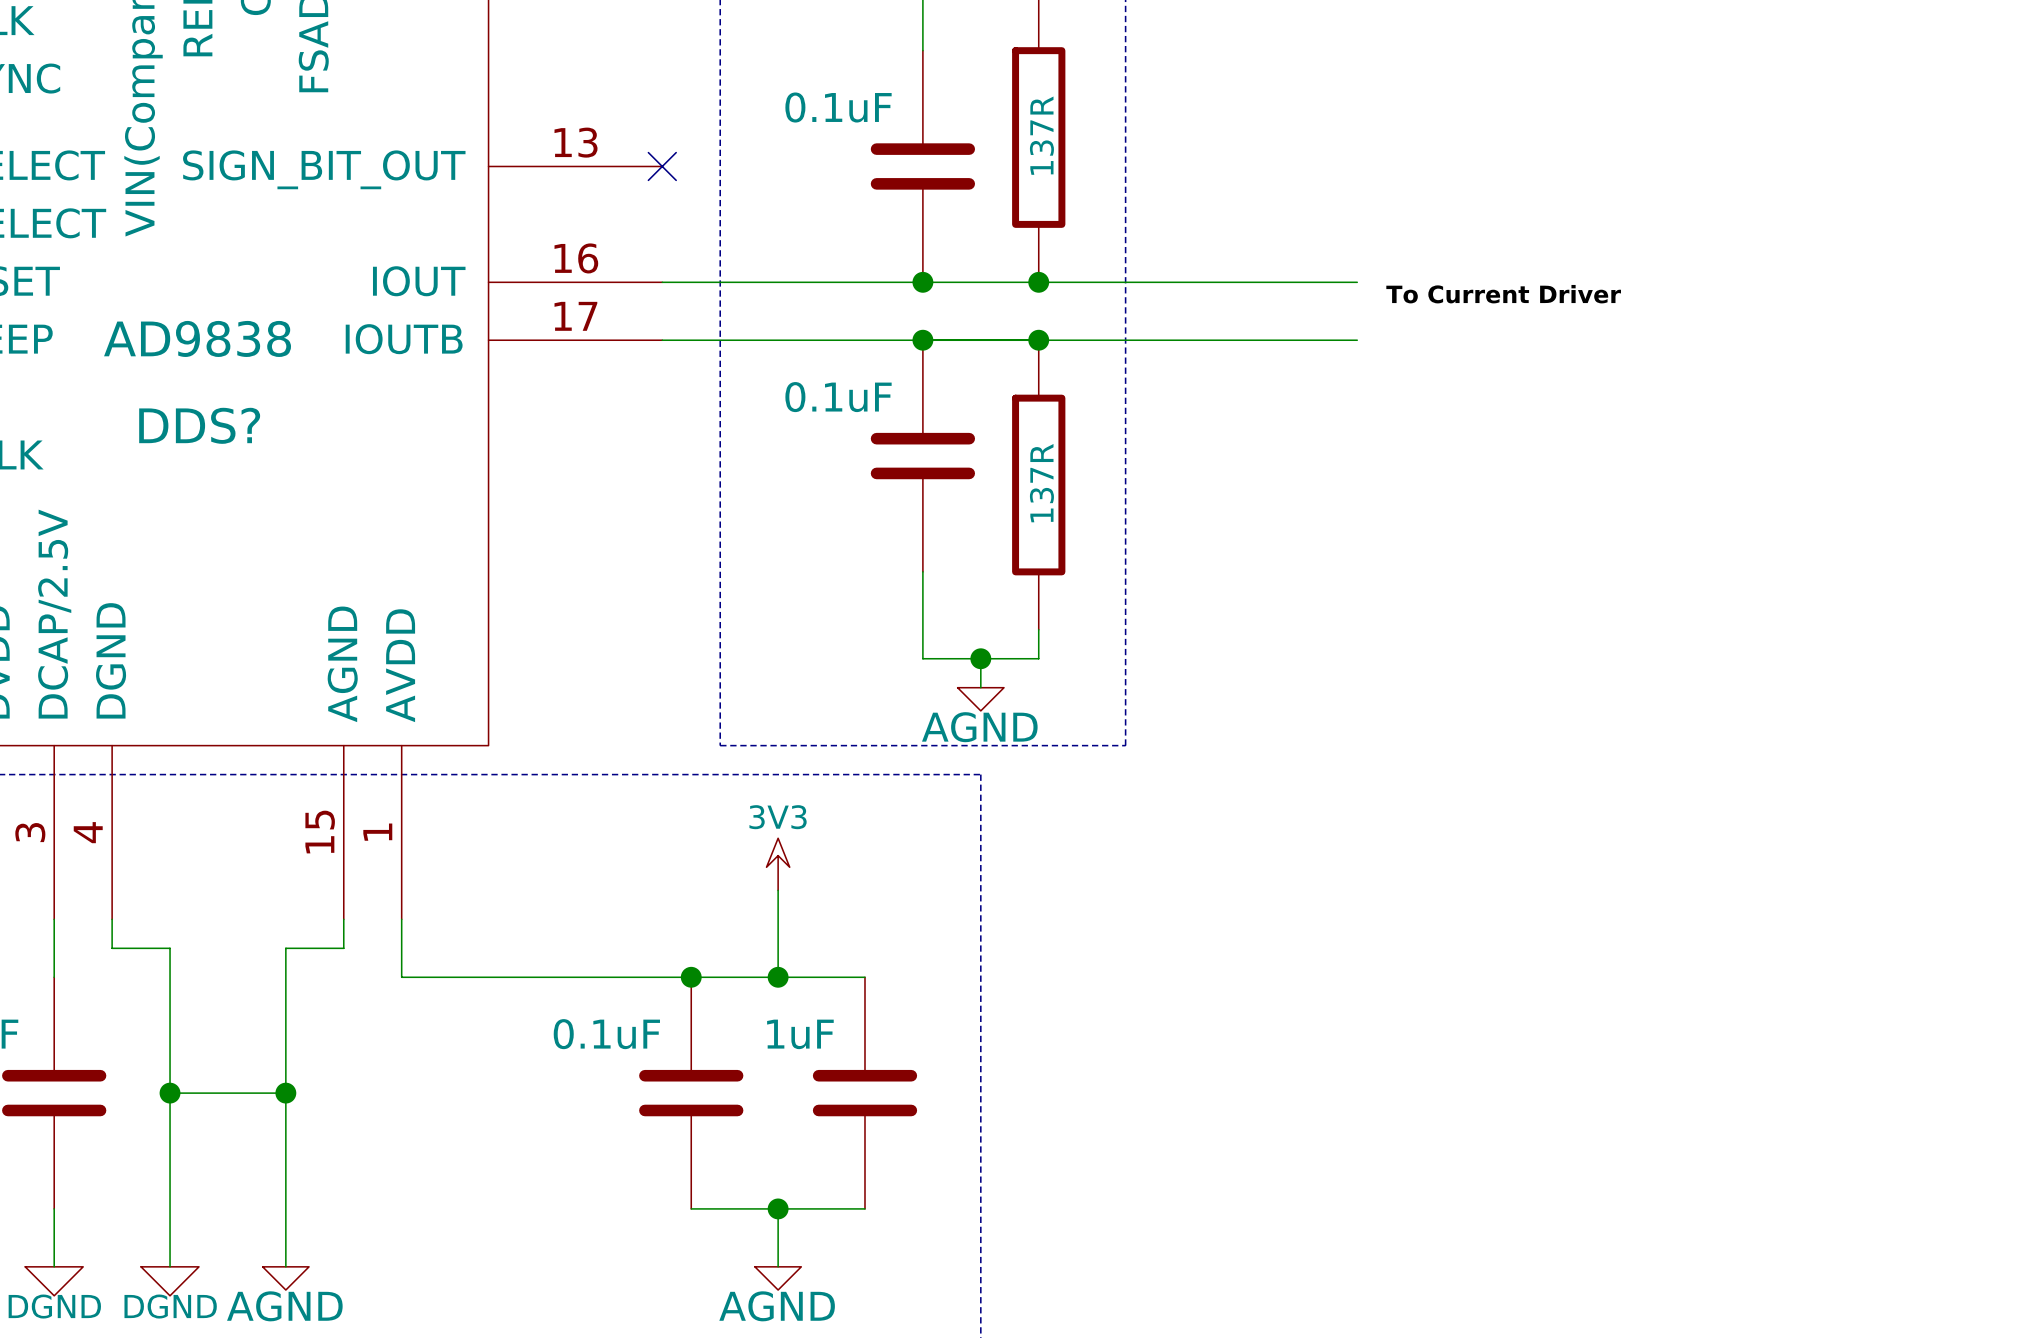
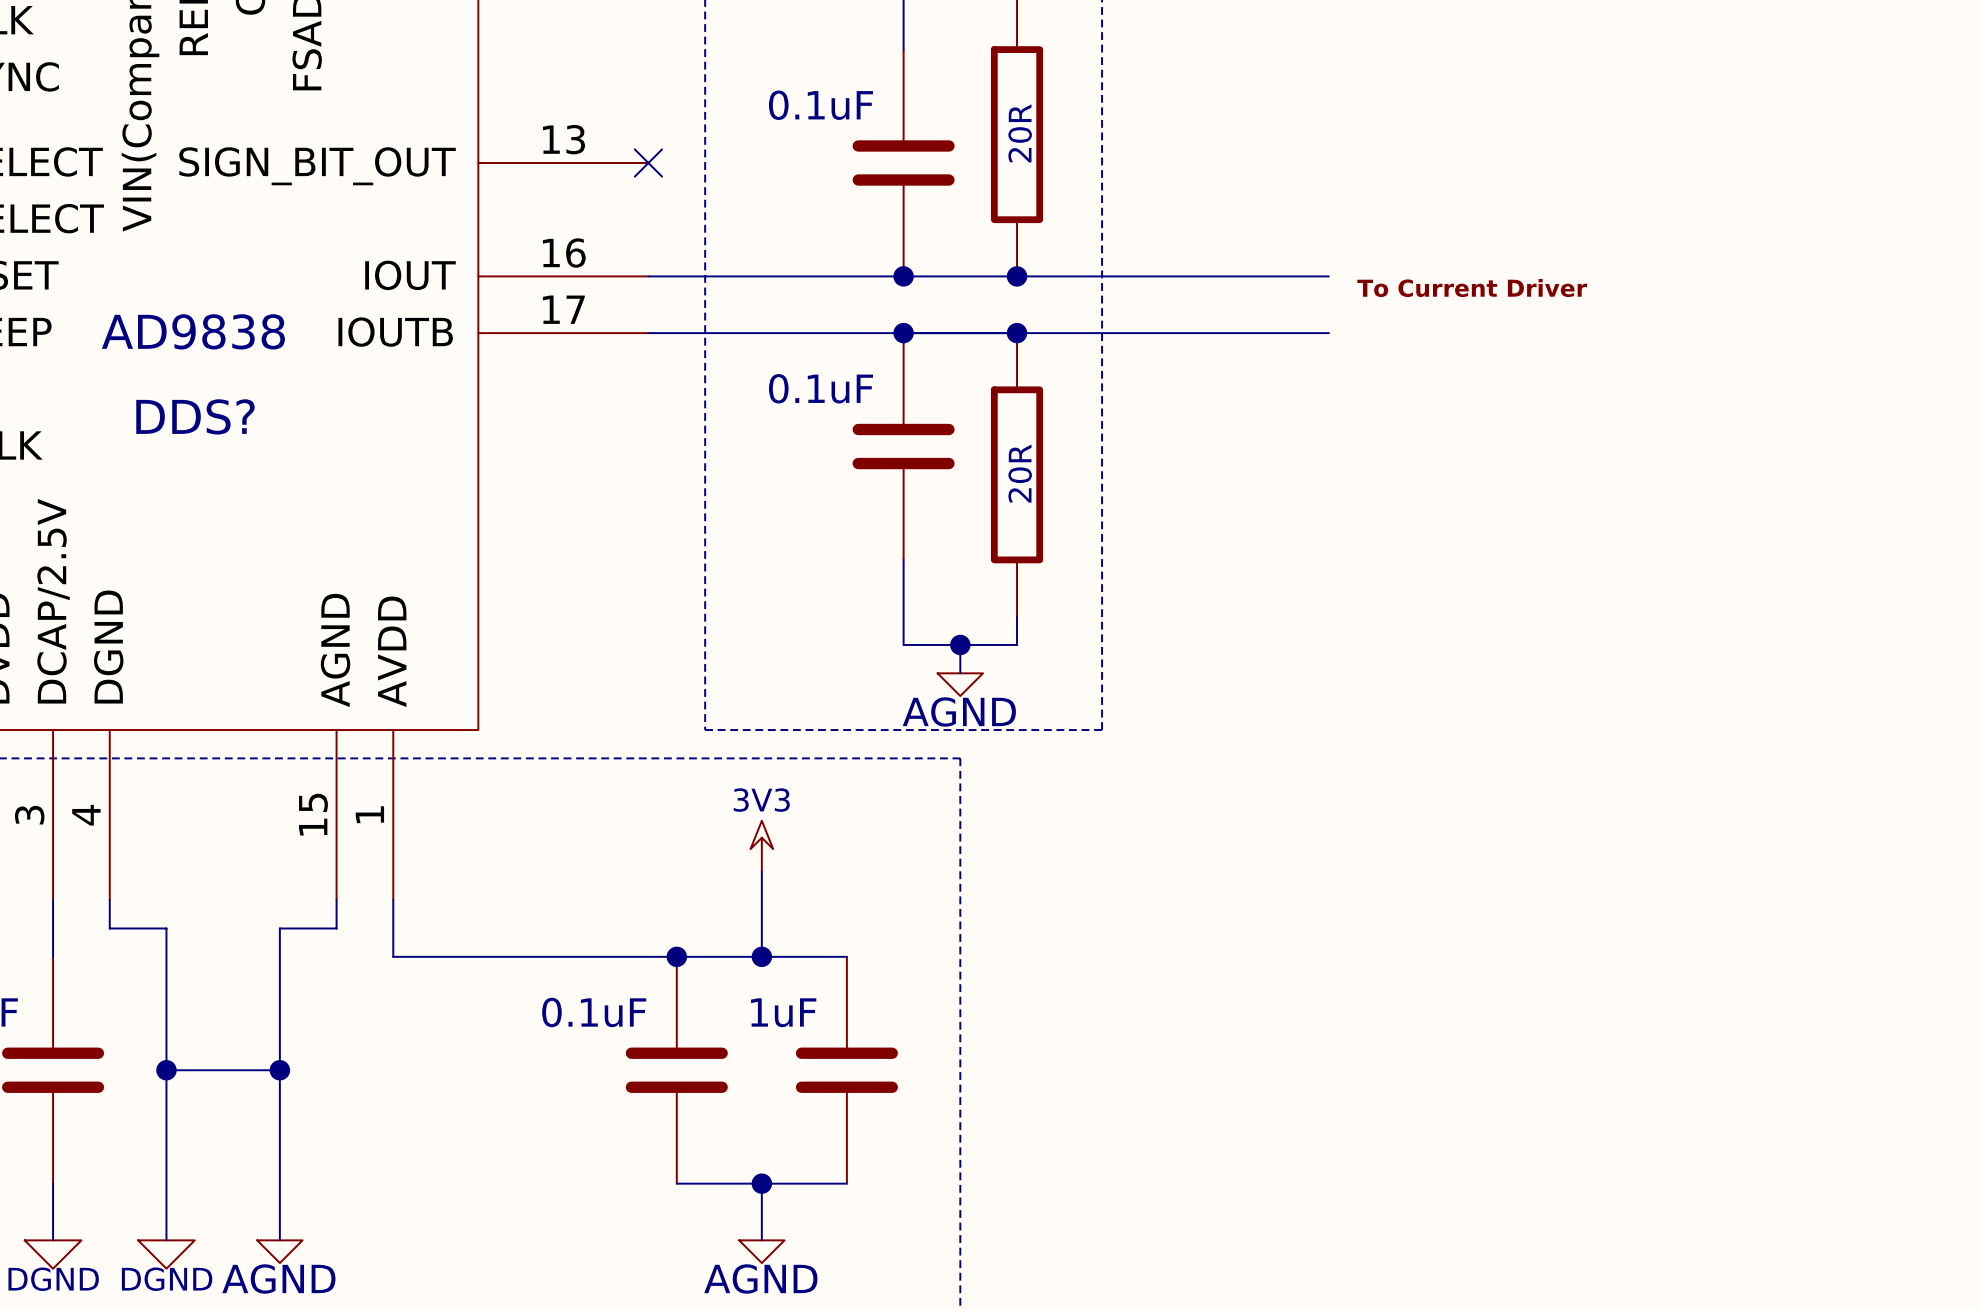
part value: 137R (1041, 135) -> 20R (1020, 133)
part value: 137R (1041, 483) -> 20R (1020, 473)

